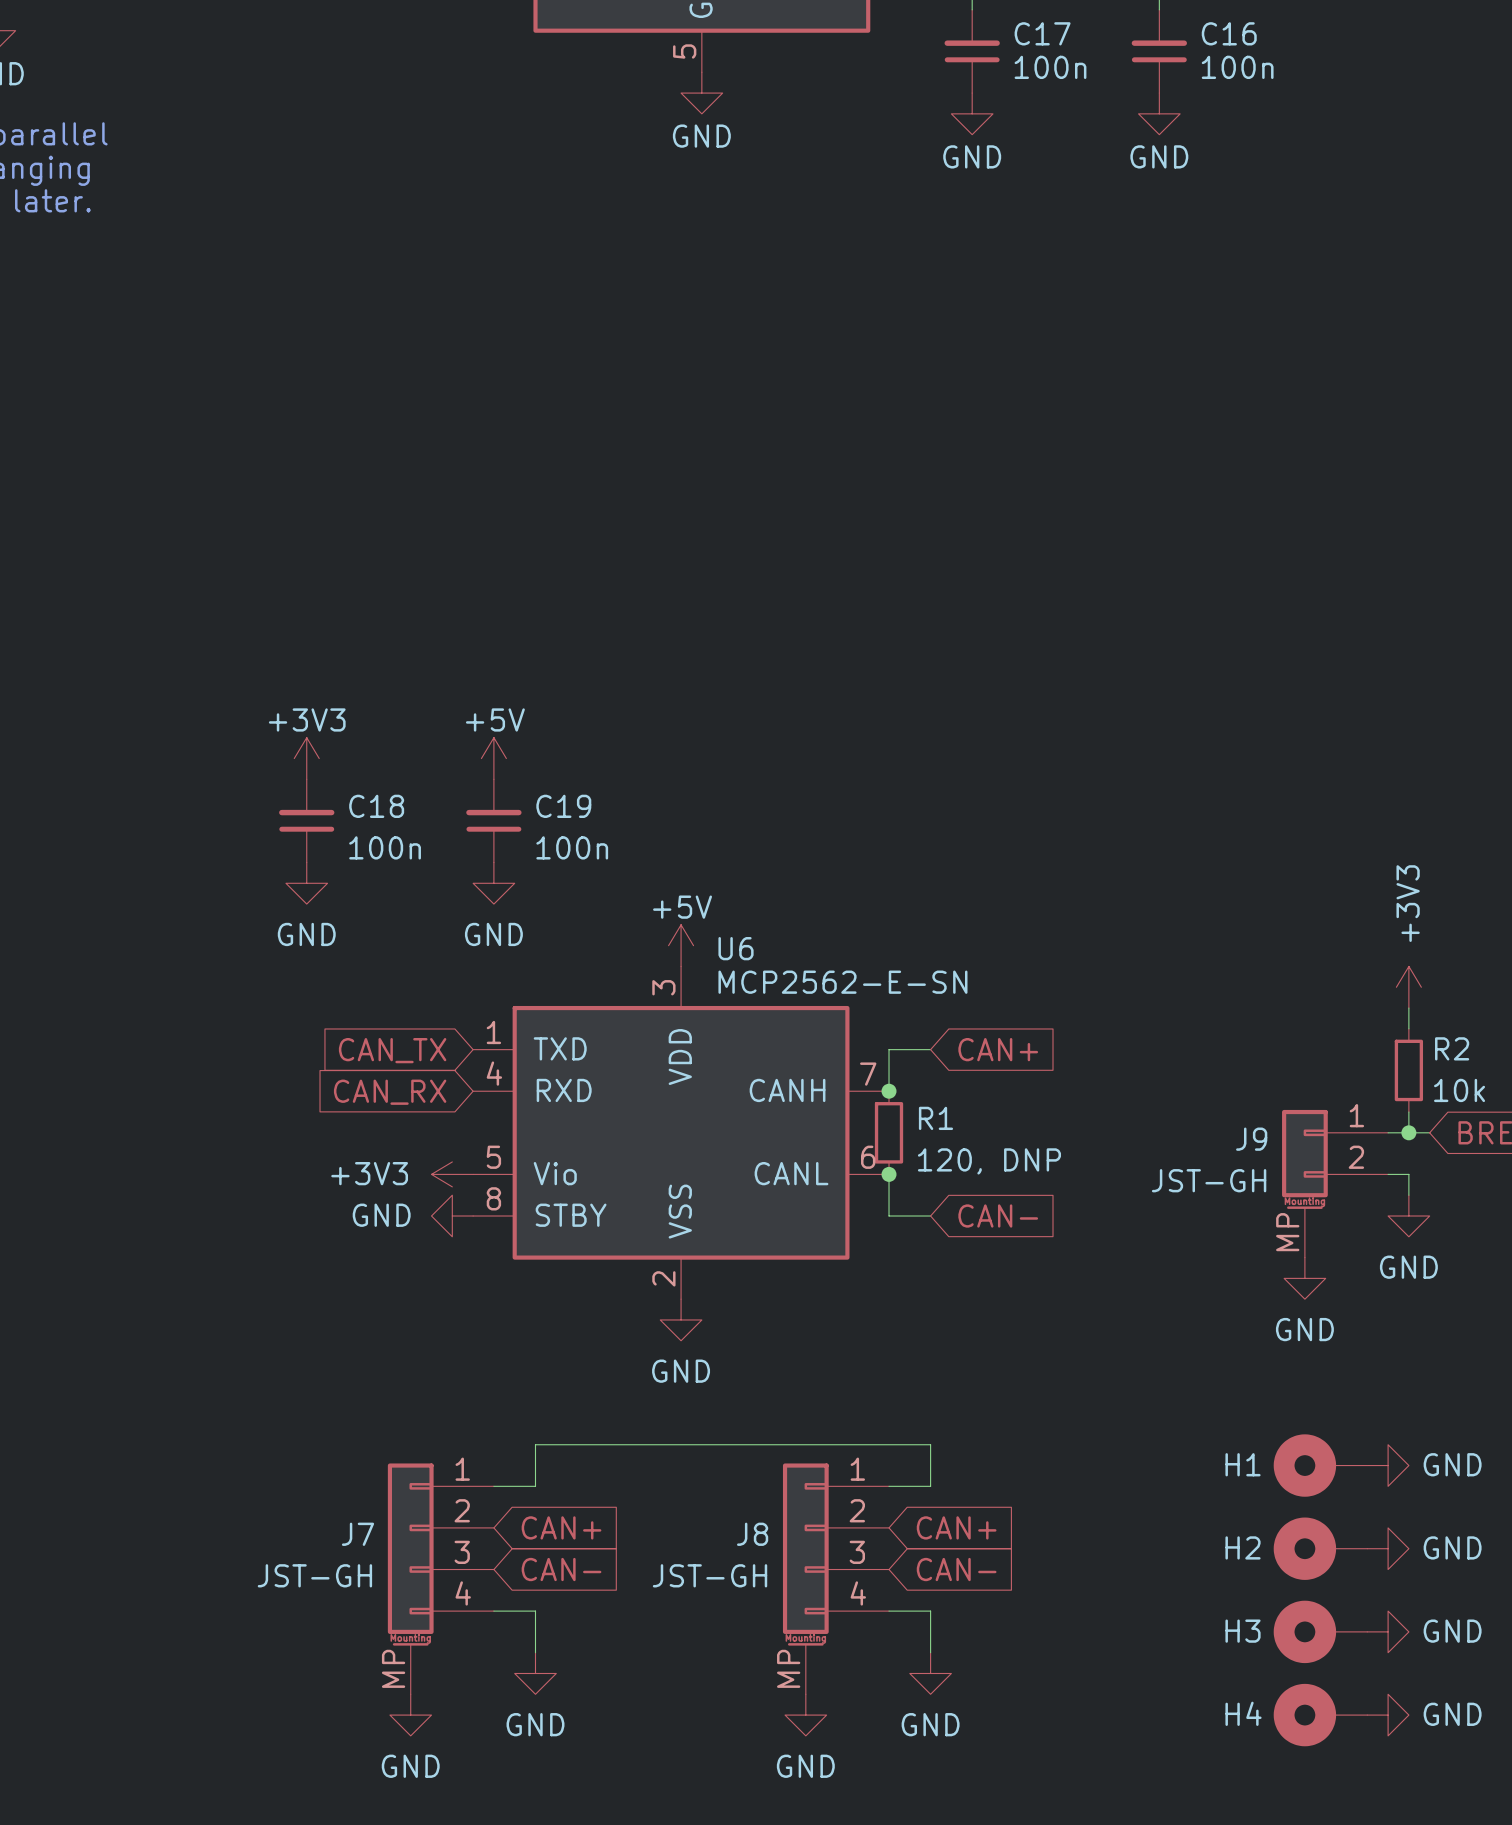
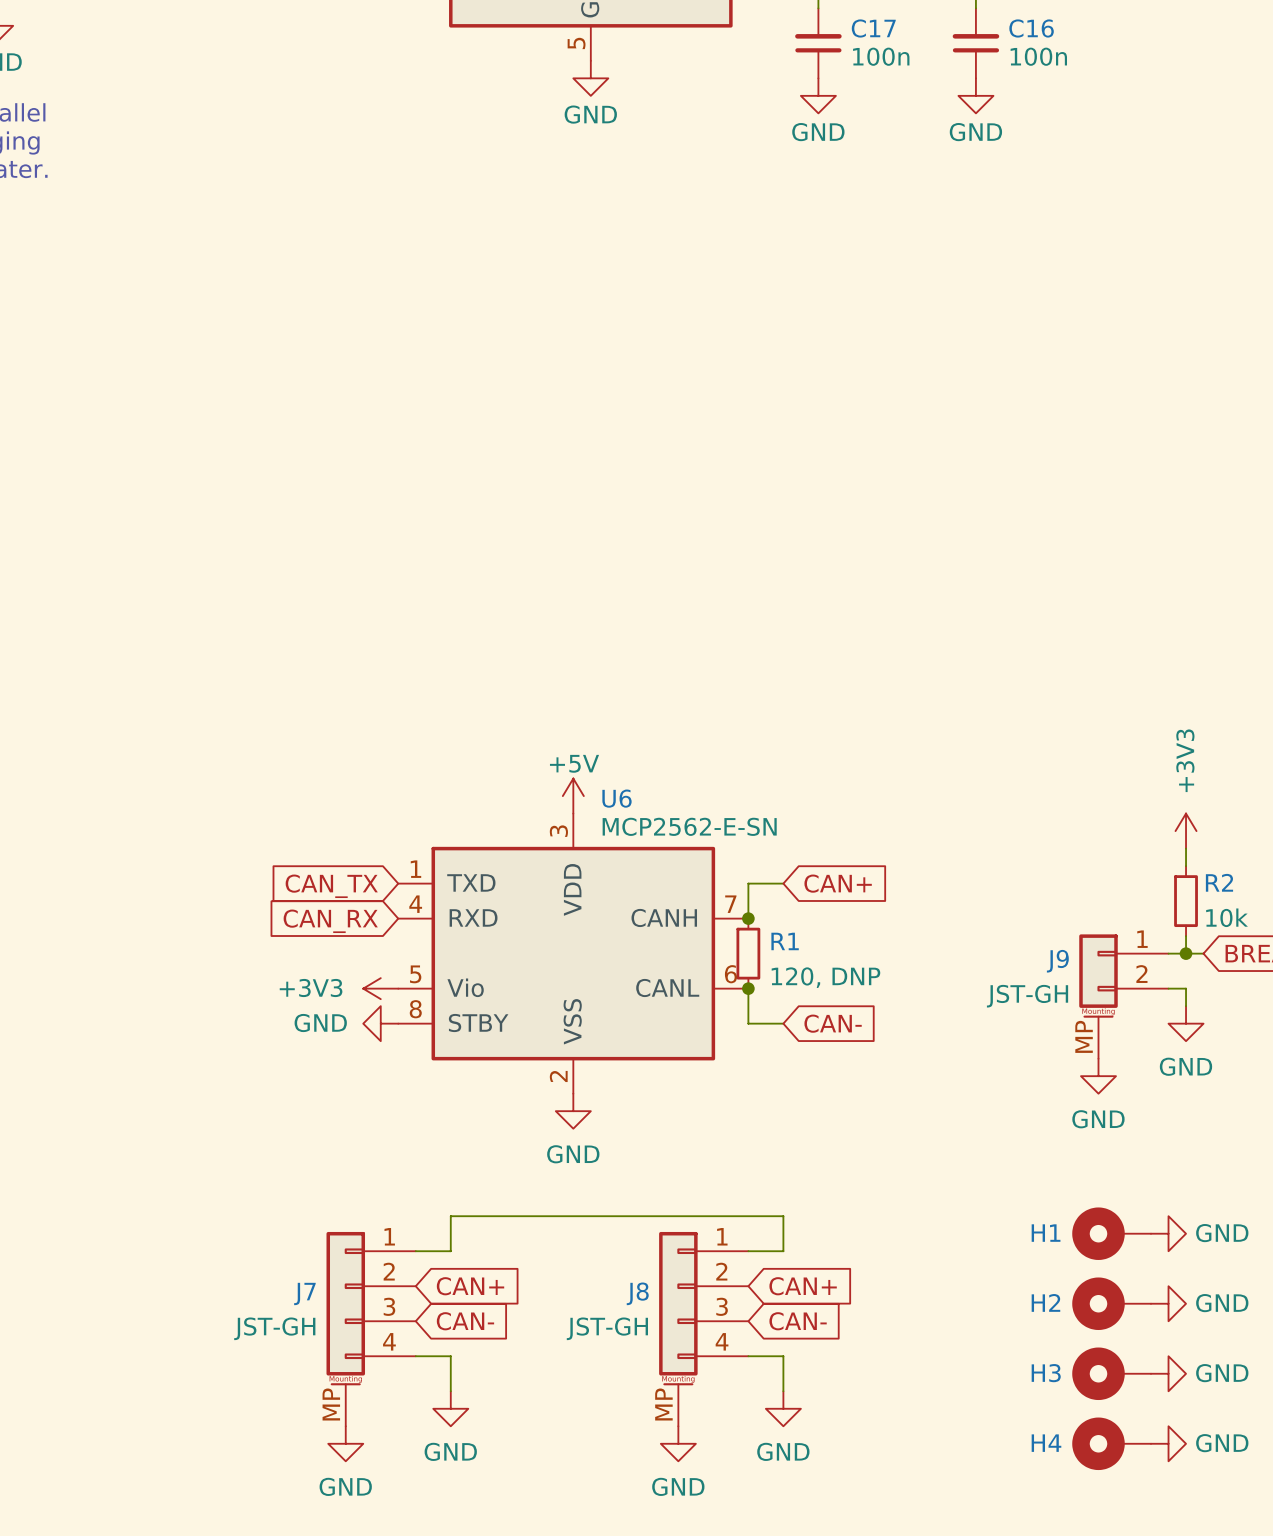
power symbol: +3V3 (306, 758) -> none
power symbol: +5V (493, 758) -> none
C18: 100n (306, 820) -> none
C19: 100n (493, 820) -> none
power symbol: GND (306, 883) -> none
power symbol: GND (493, 883) -> none

